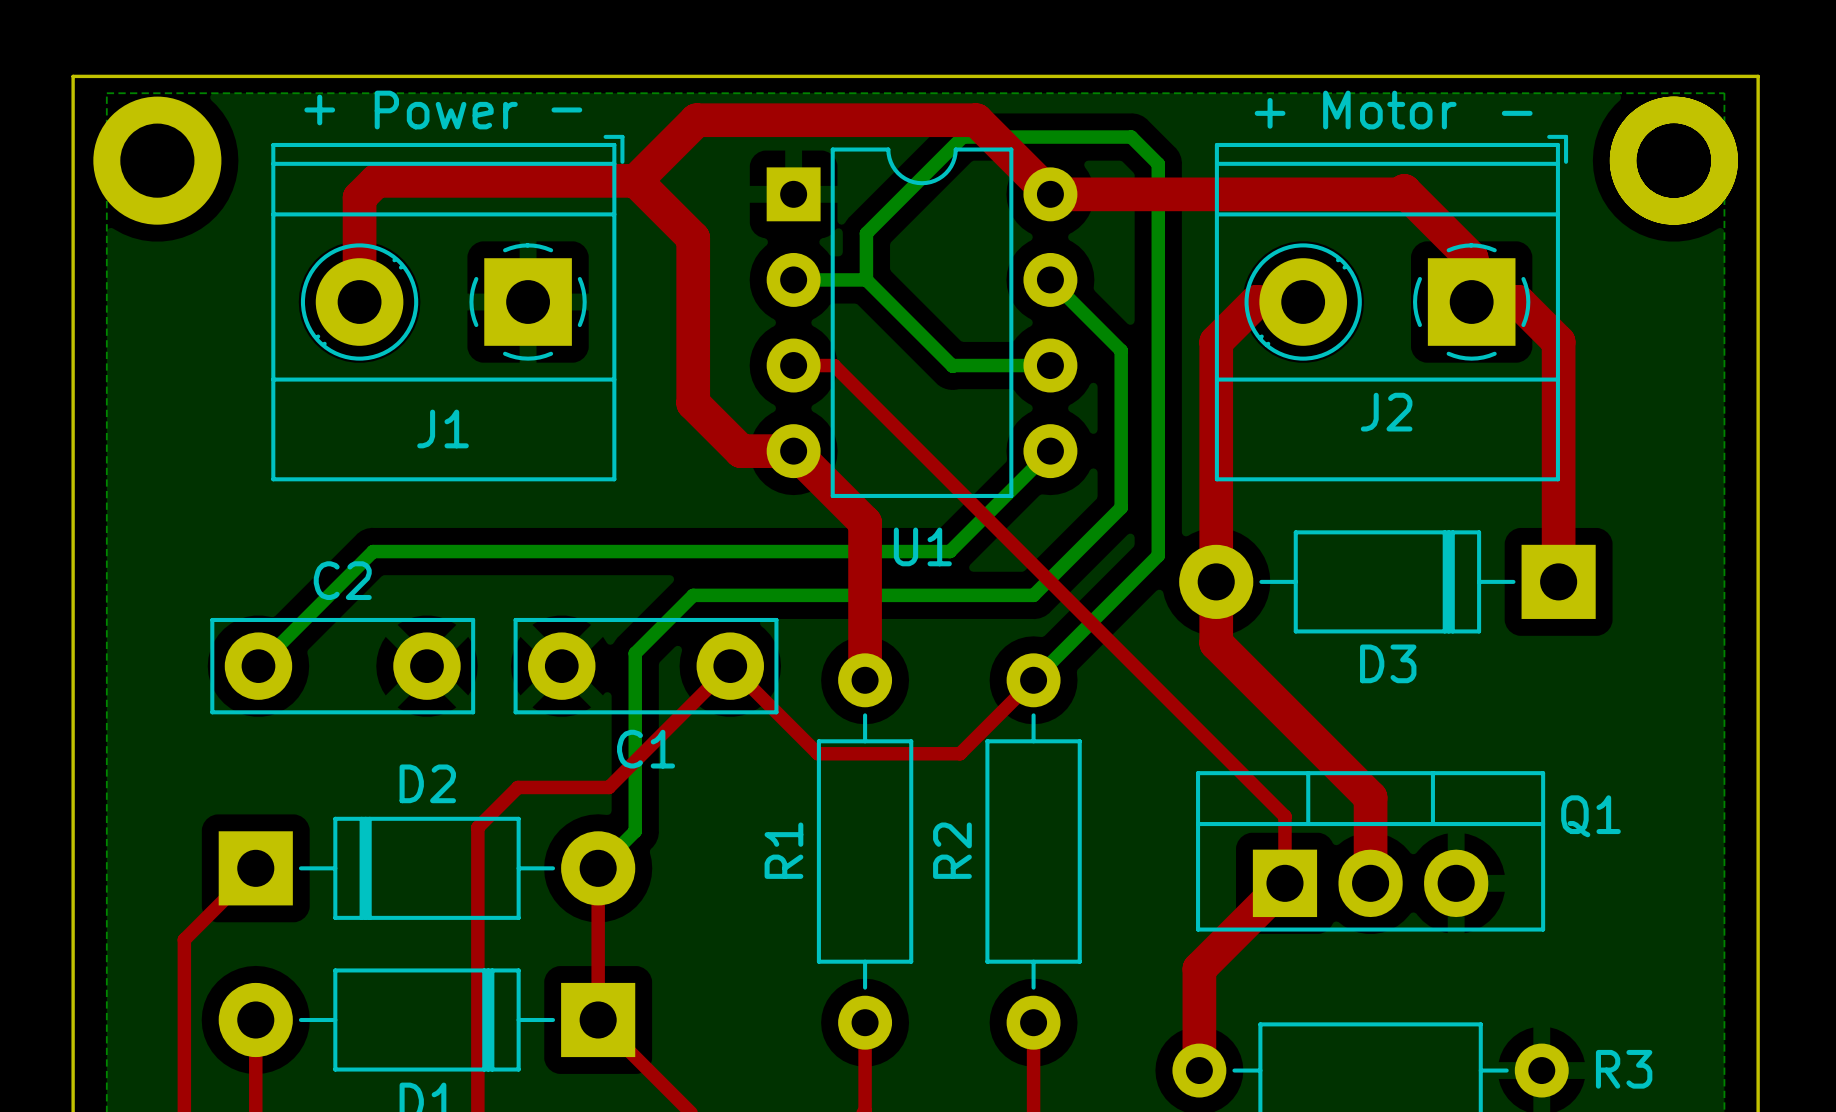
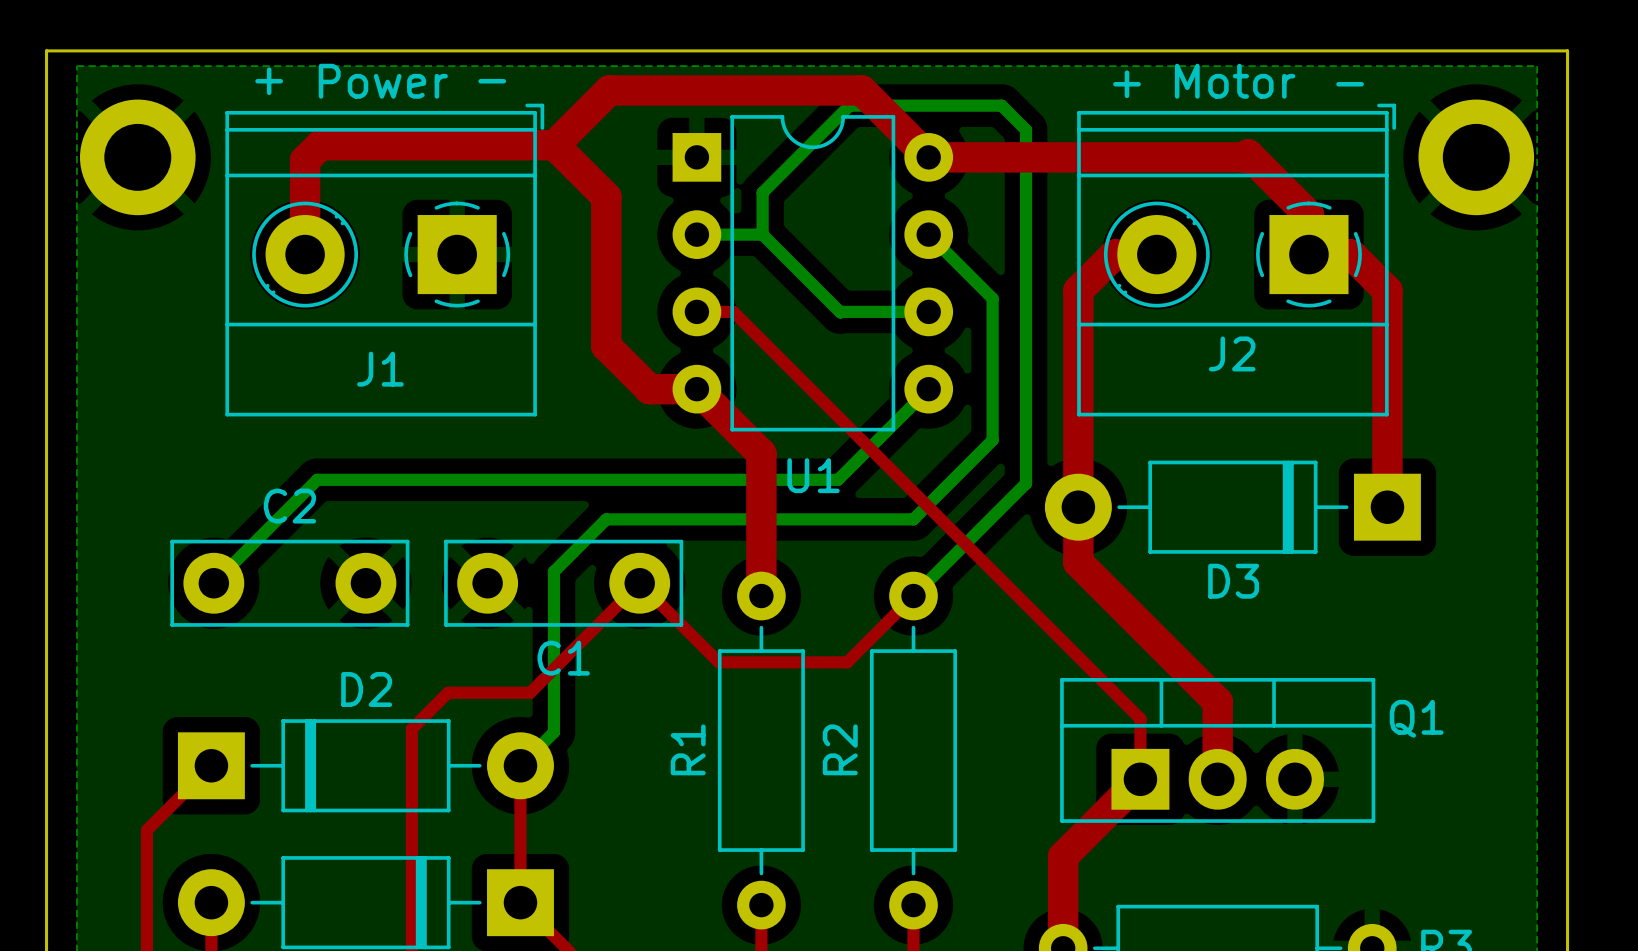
part position: (157, 160) -> (137, 157)
part position: (1673, 160) -> (1476, 157)

